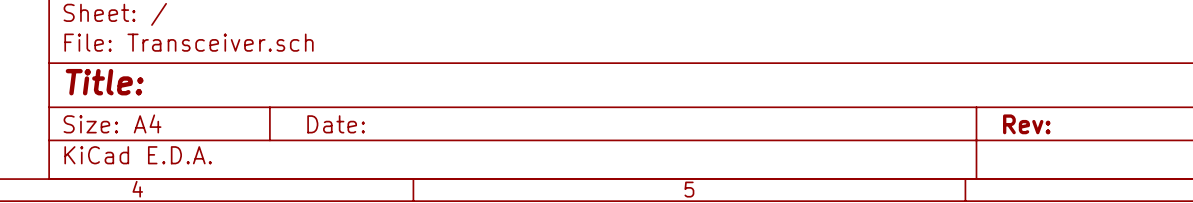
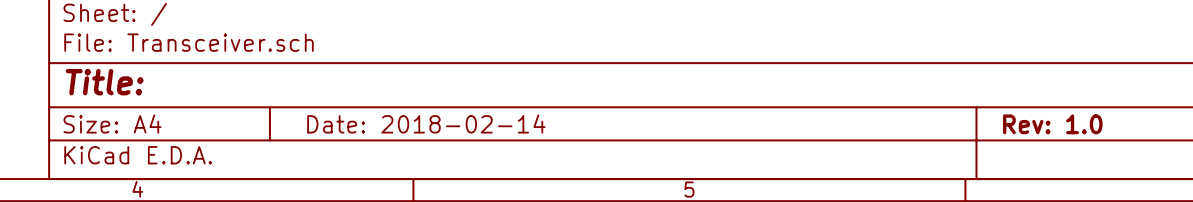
title block: Date: (336, 124) -> Date: 2018-02-14 (426, 123)
title block: Rev: (1026, 124) -> Rev: 1.0 (1052, 124)

